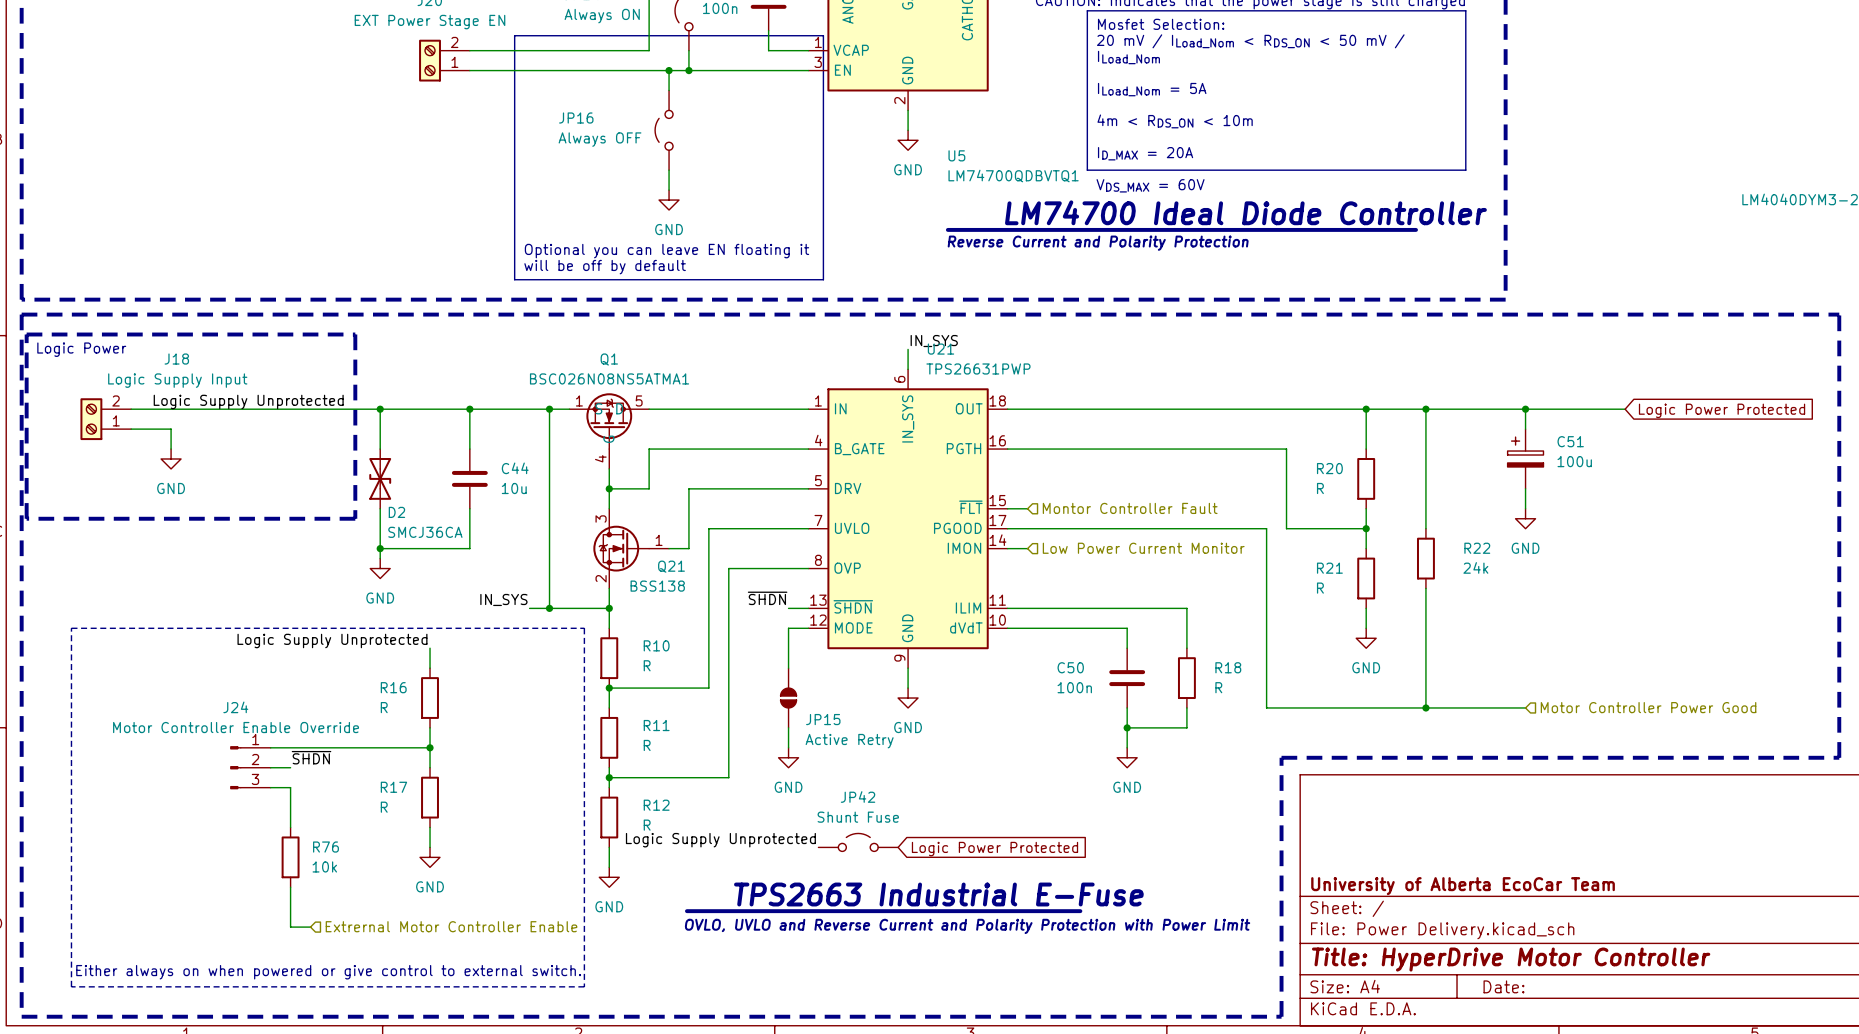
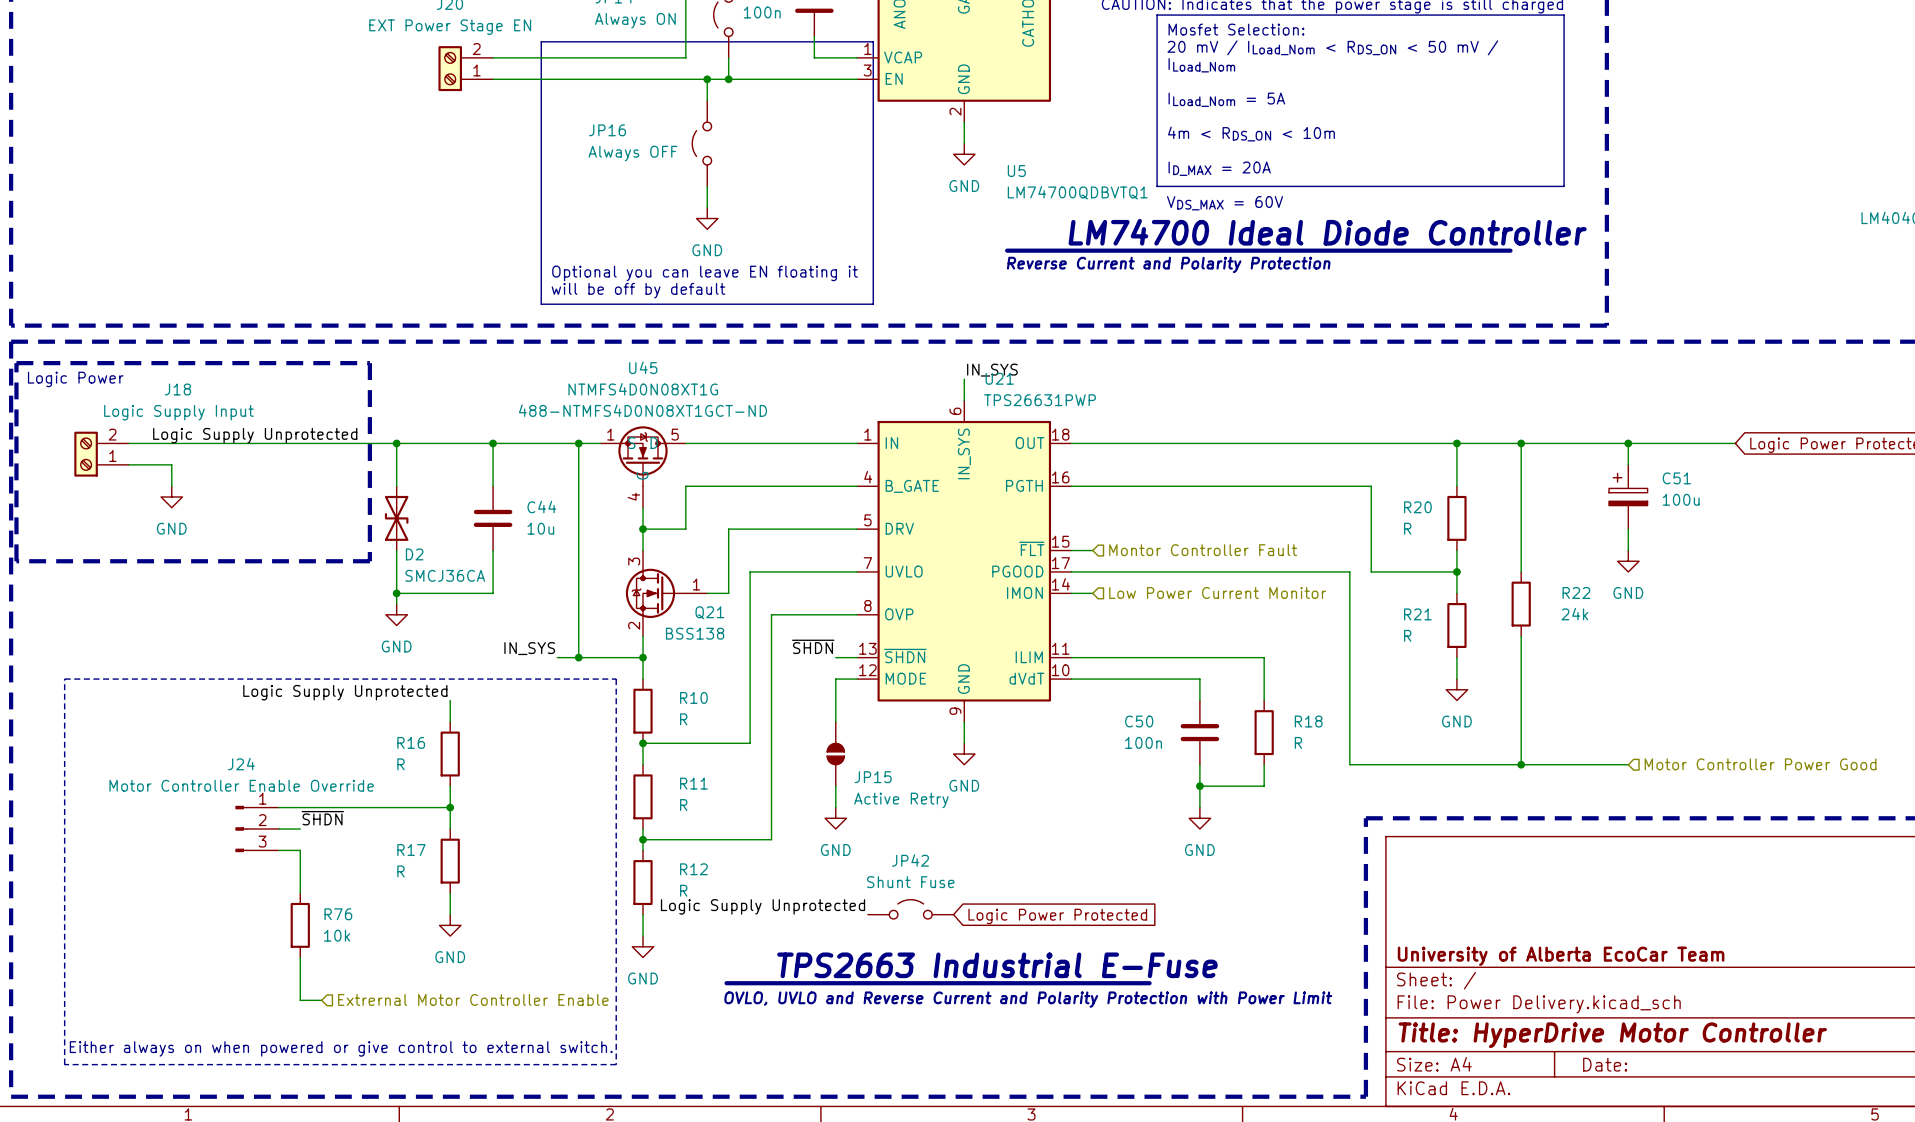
Q1 name: Q1 (609, 359) -> U45 (643, 367)
Q1 text: none -> 488-NTMFS4D0N08XT1GCT-ND (642, 410)
Q1 value: BSC026N08NS5ATMA1 (609, 378) -> NTMFS4D0N08XT1G (643, 389)

